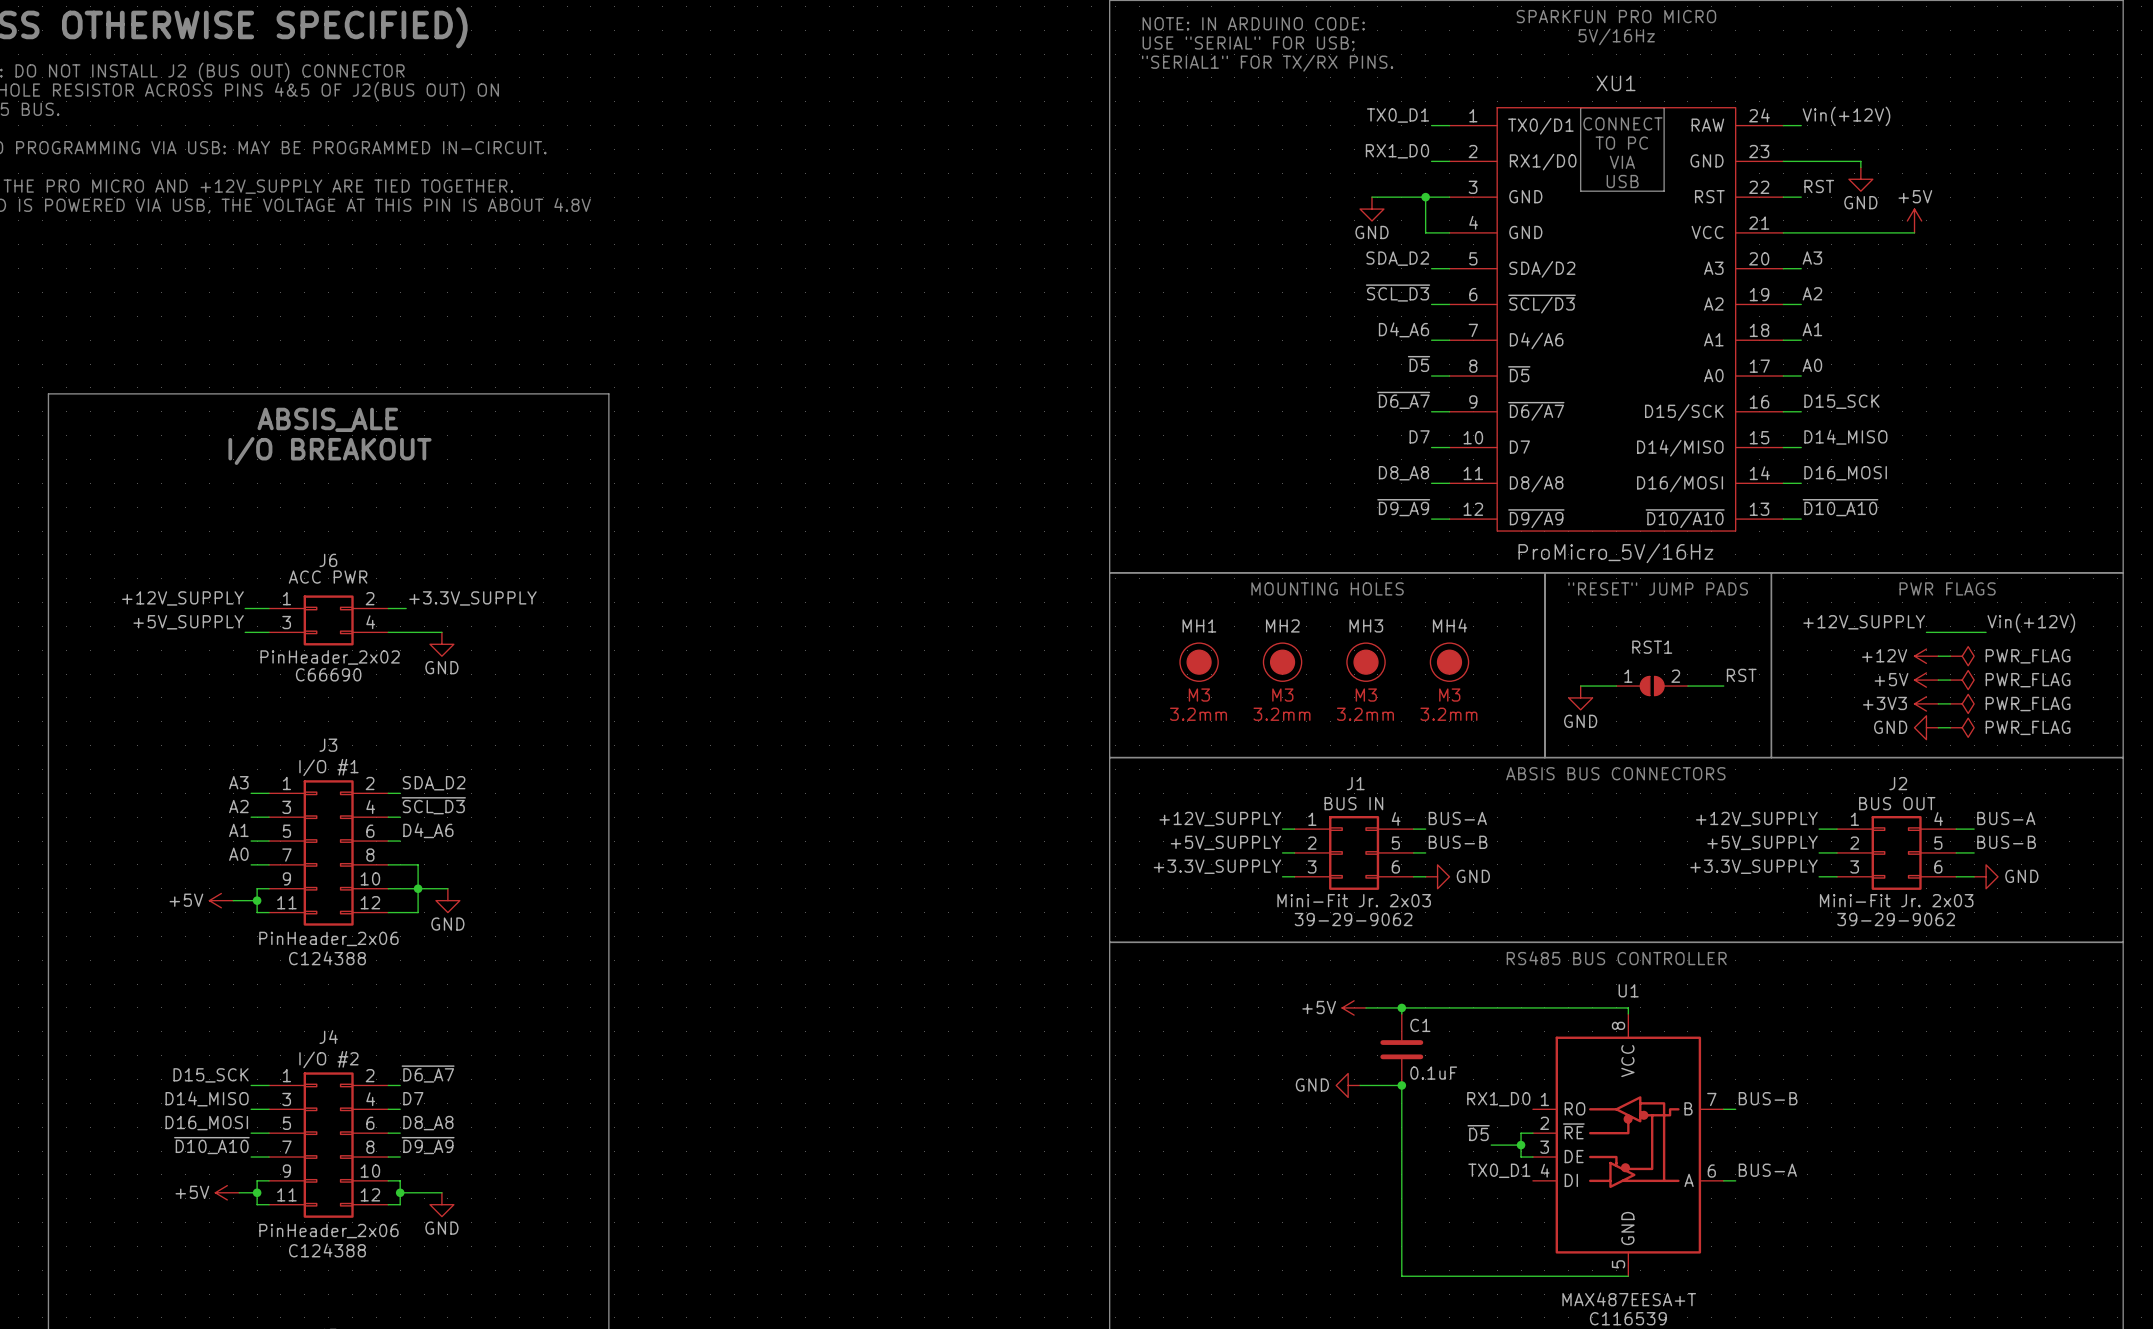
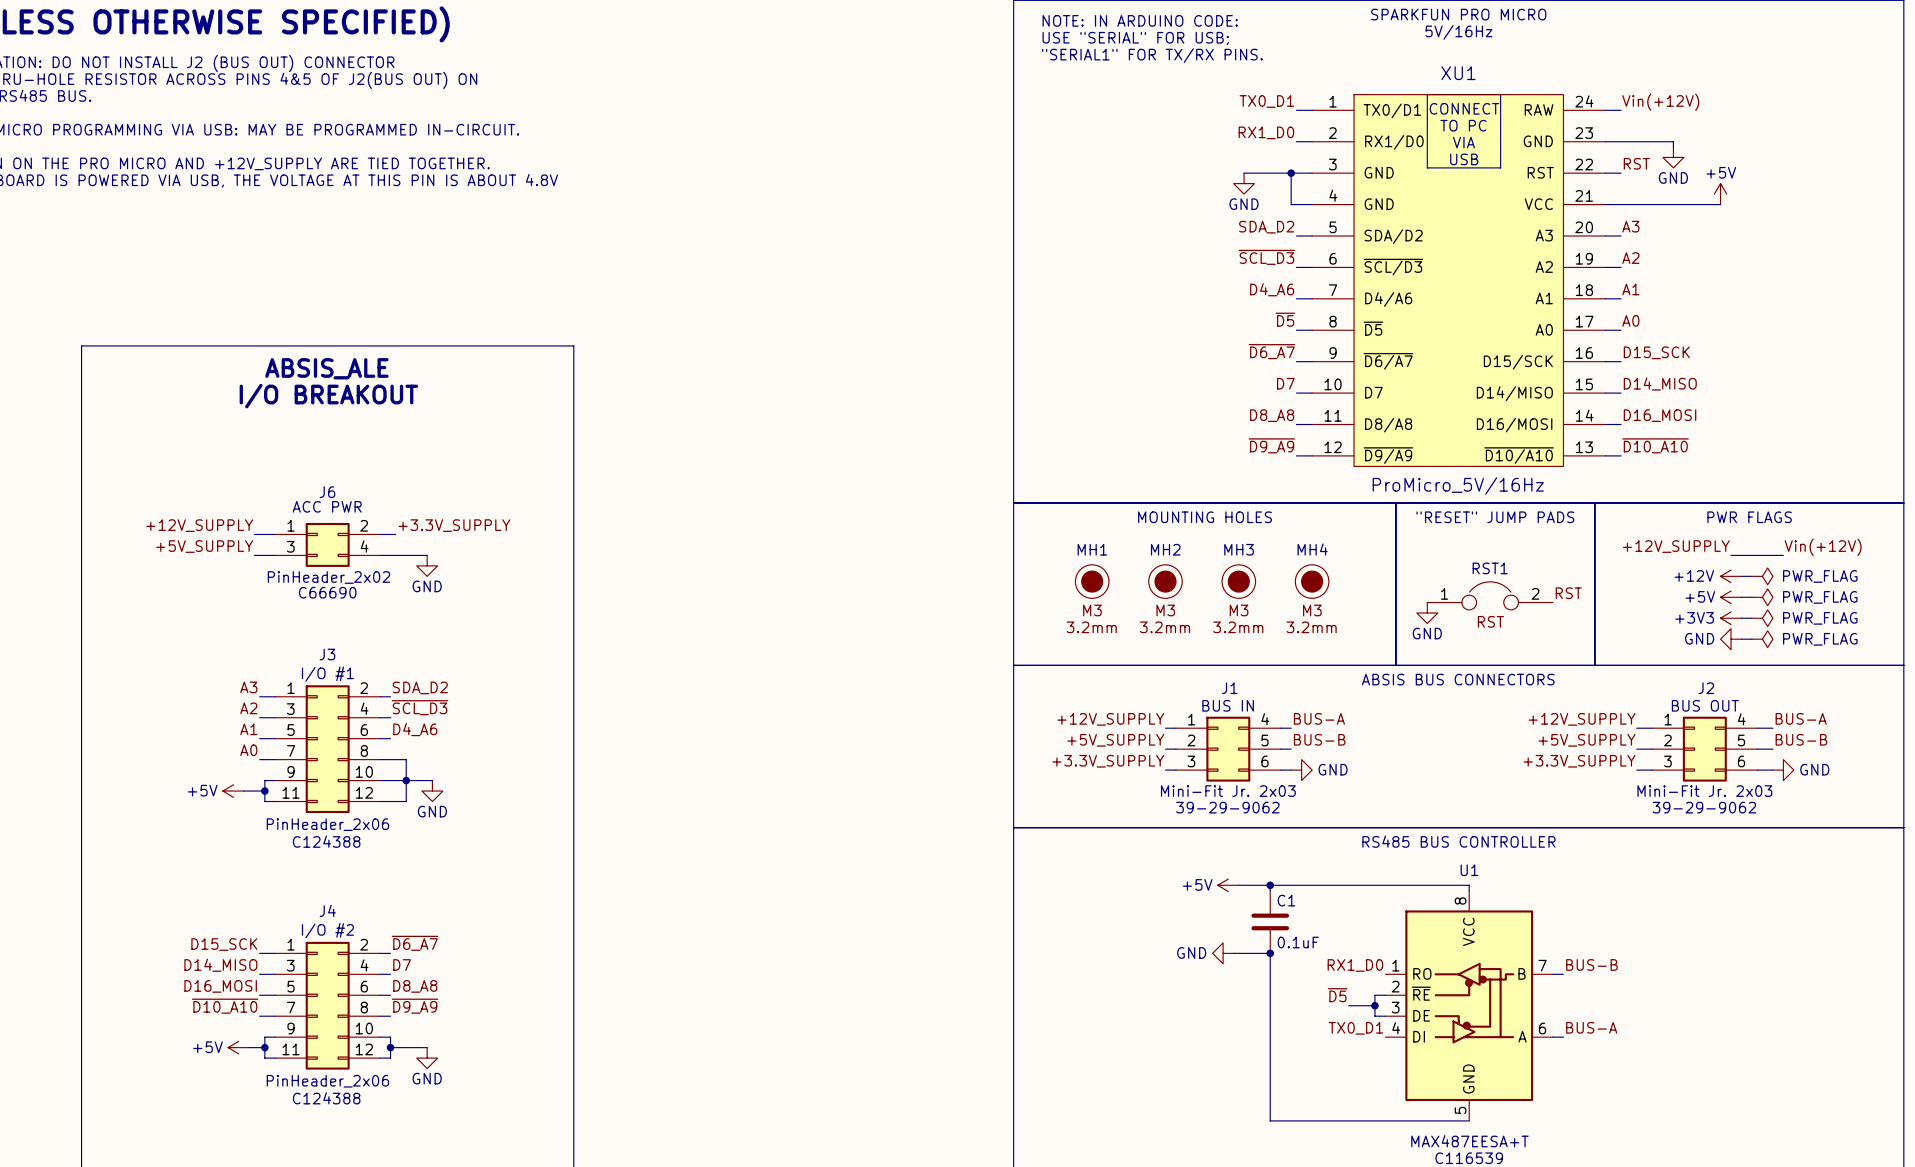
RST1 symbol: [1616, 676, 1688, 696] -> [1427, 581, 1553, 610]

